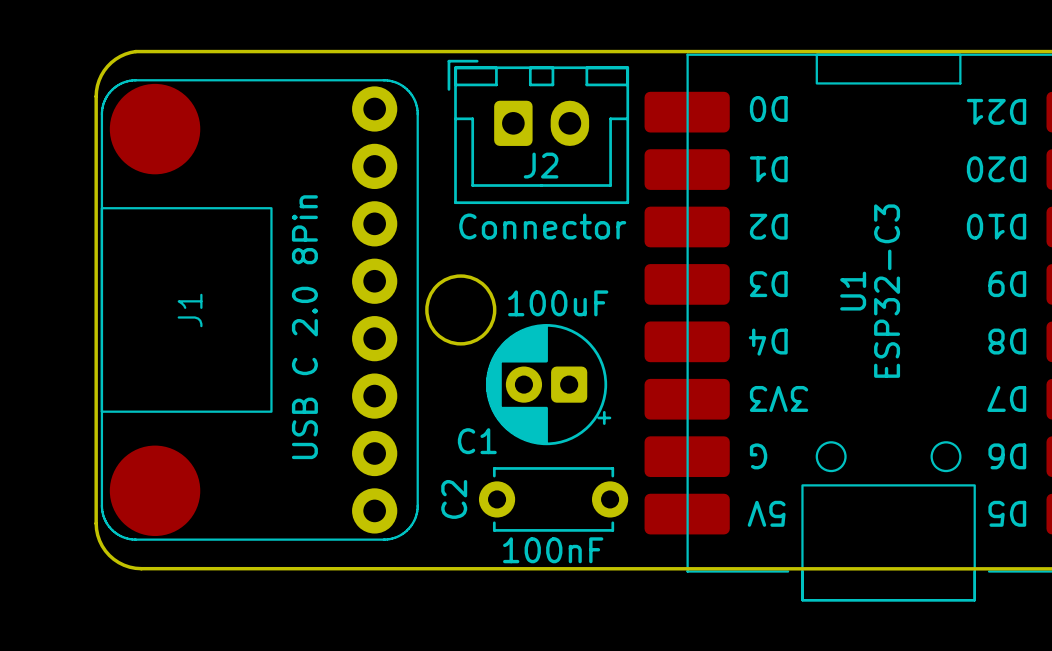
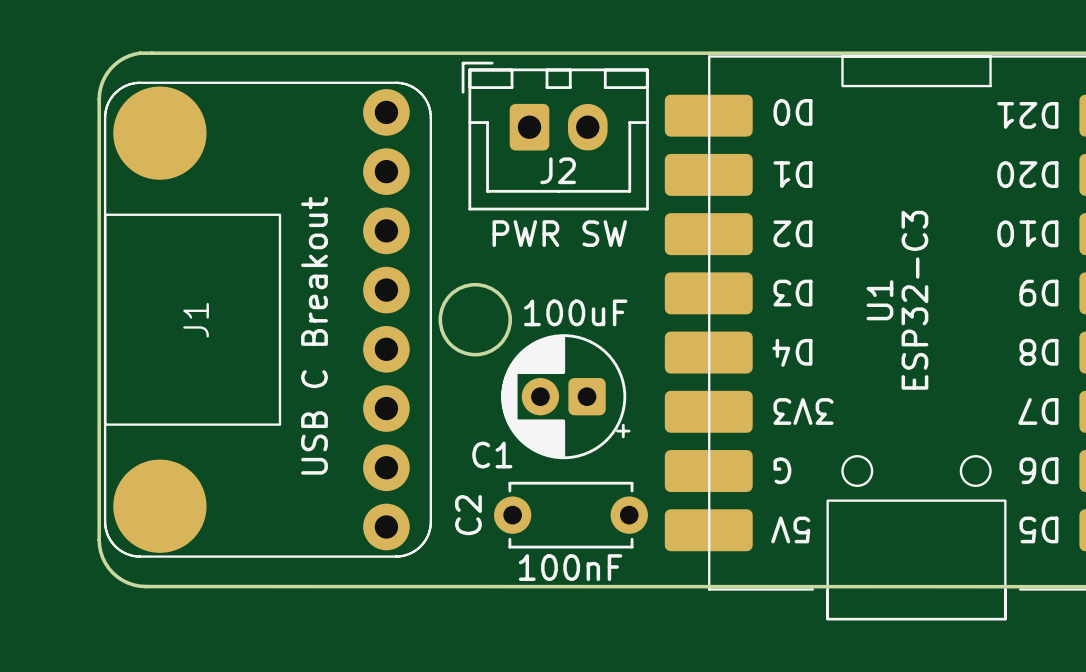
J2 value: Connector (542, 226) -> PWR SW (559, 233)
J1 value: USB C 2.0 8Pin (304, 327) -> USB C Breakout (314, 335)

